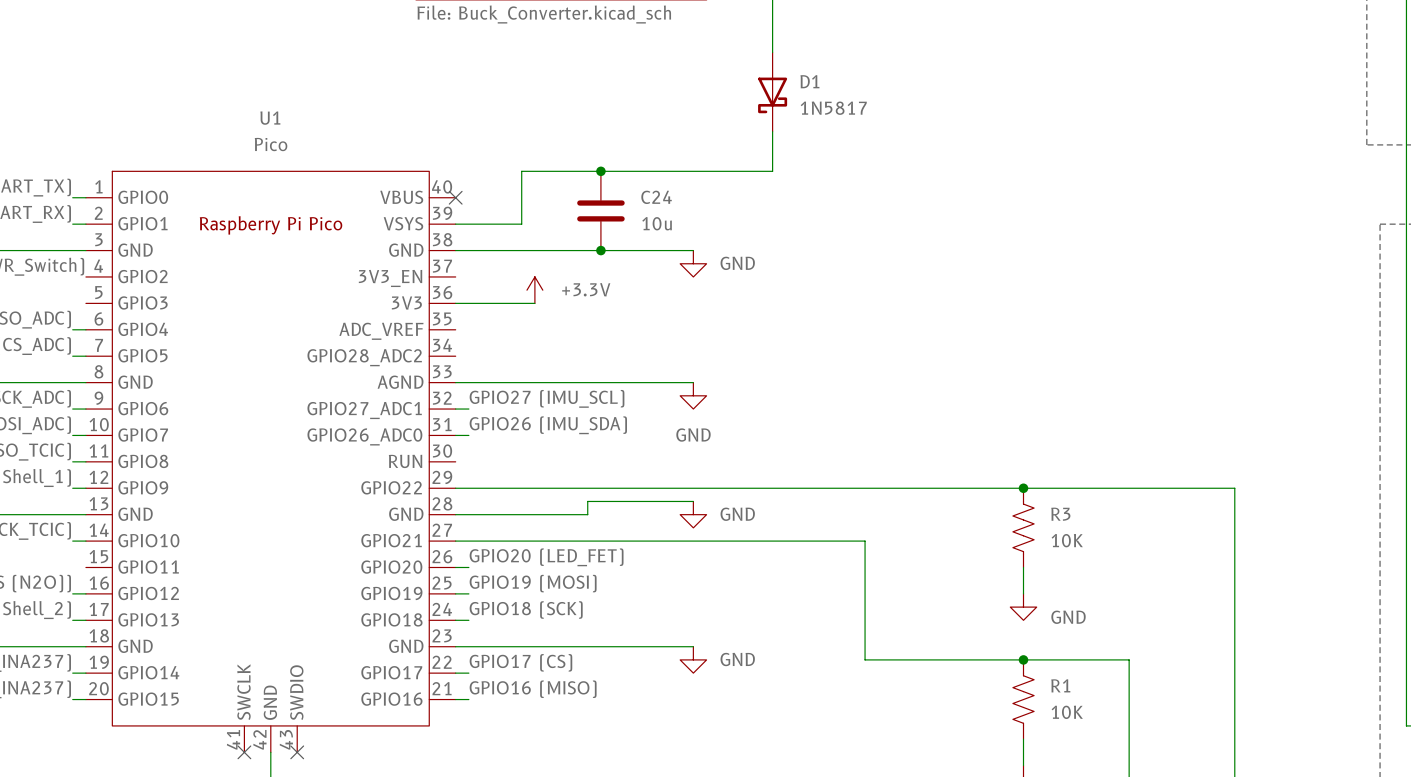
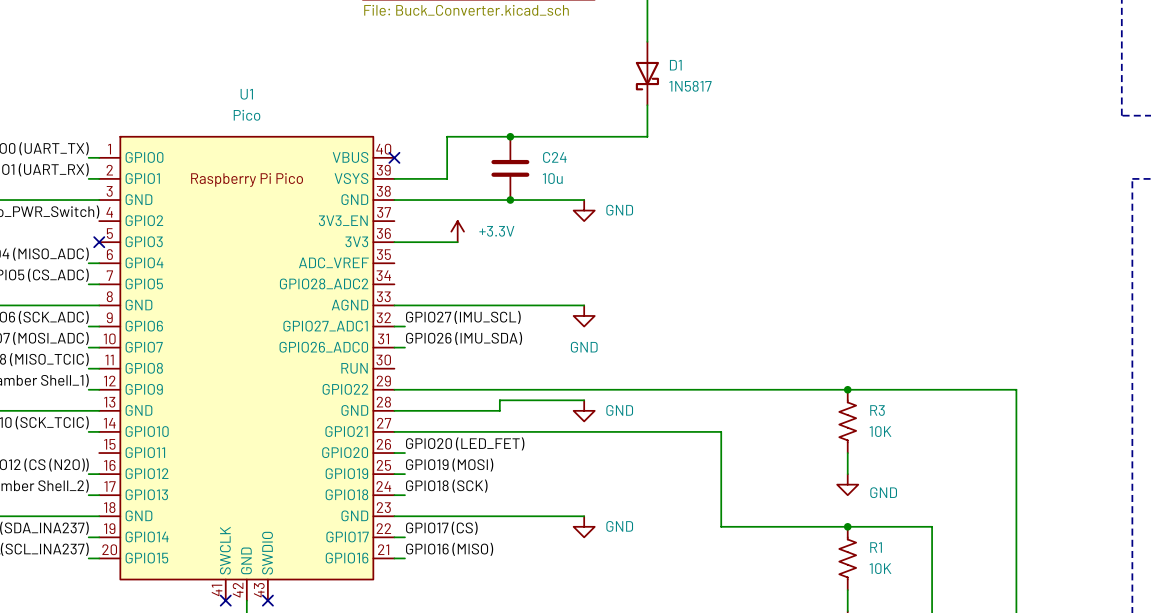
no-connect mark: none -> (99, 242)

